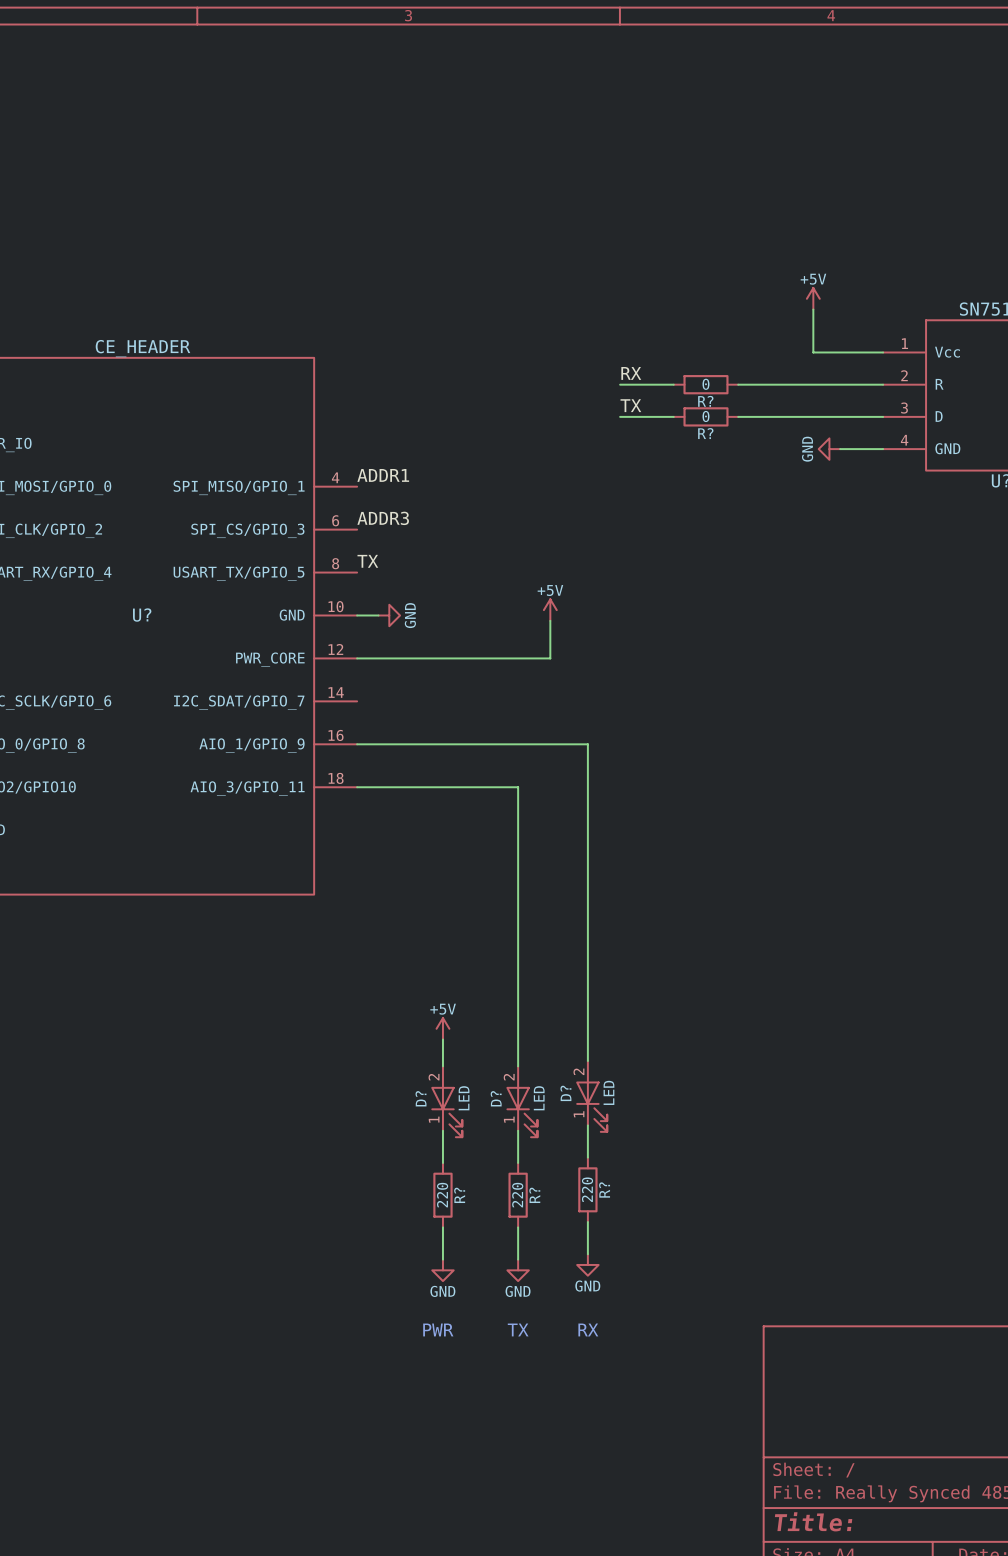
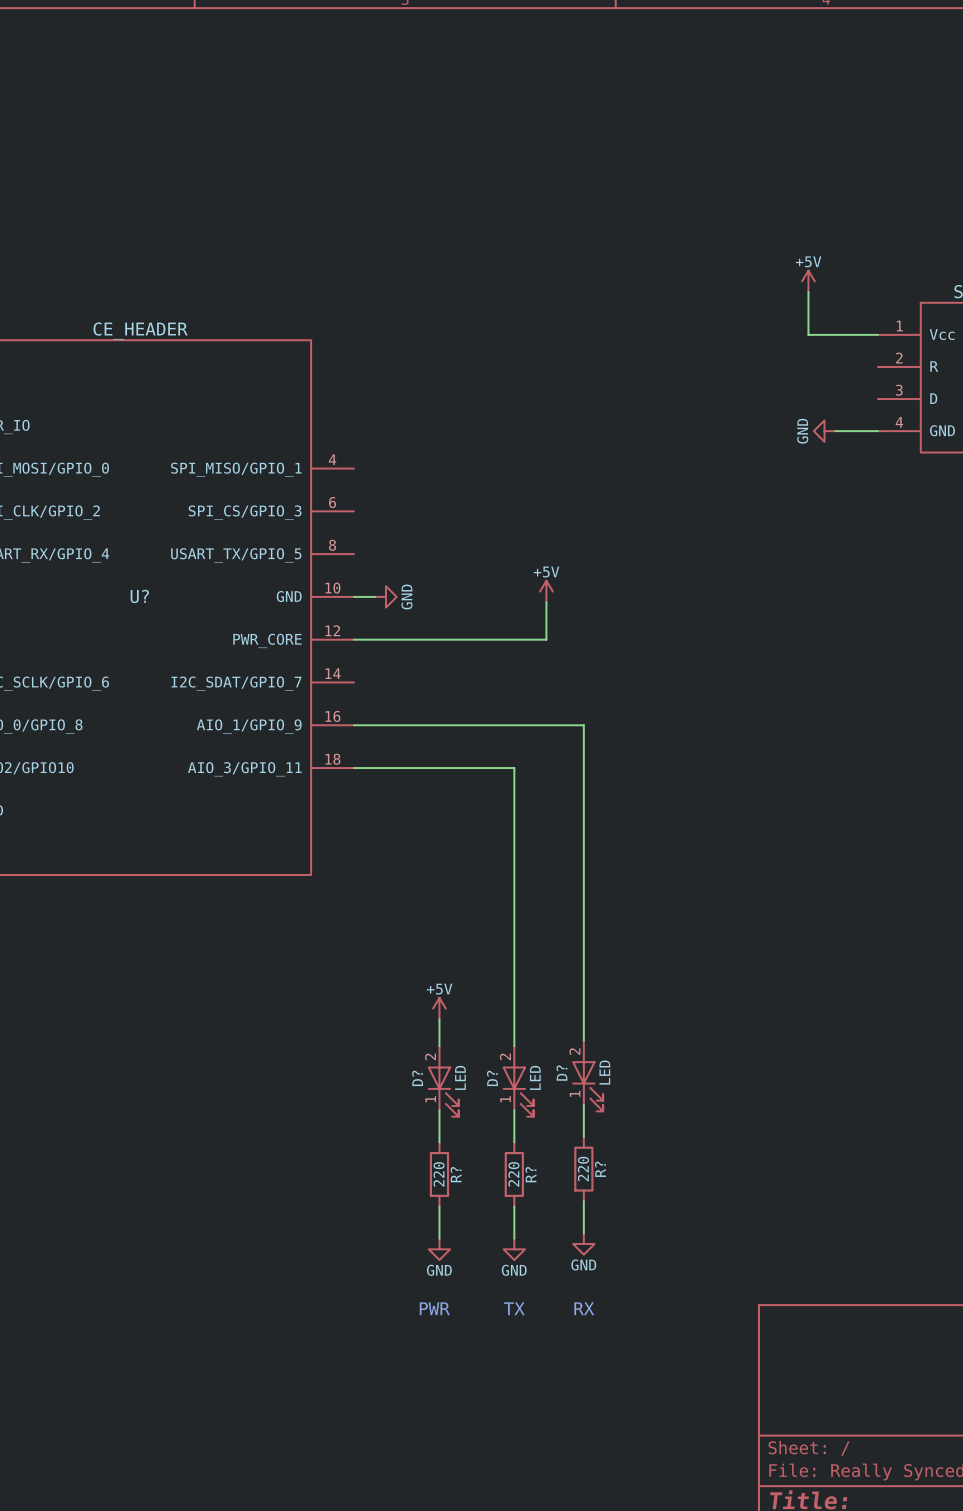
label: RX (631, 373) -> none
wire: (620, 384) (673, 384) -> none
R?: 0 (705, 384) -> none
wire: (738, 384) (883, 384) -> none
label: TX (630, 405) -> none
wire: (620, 416) (673, 416) -> none
R?: 0 (705, 416) -> none
wire: (738, 416) (883, 416) -> none
label: ADDR1 (383, 475) -> none
label: ADDR3 (383, 518) -> none
label: TX (367, 561) -> none

